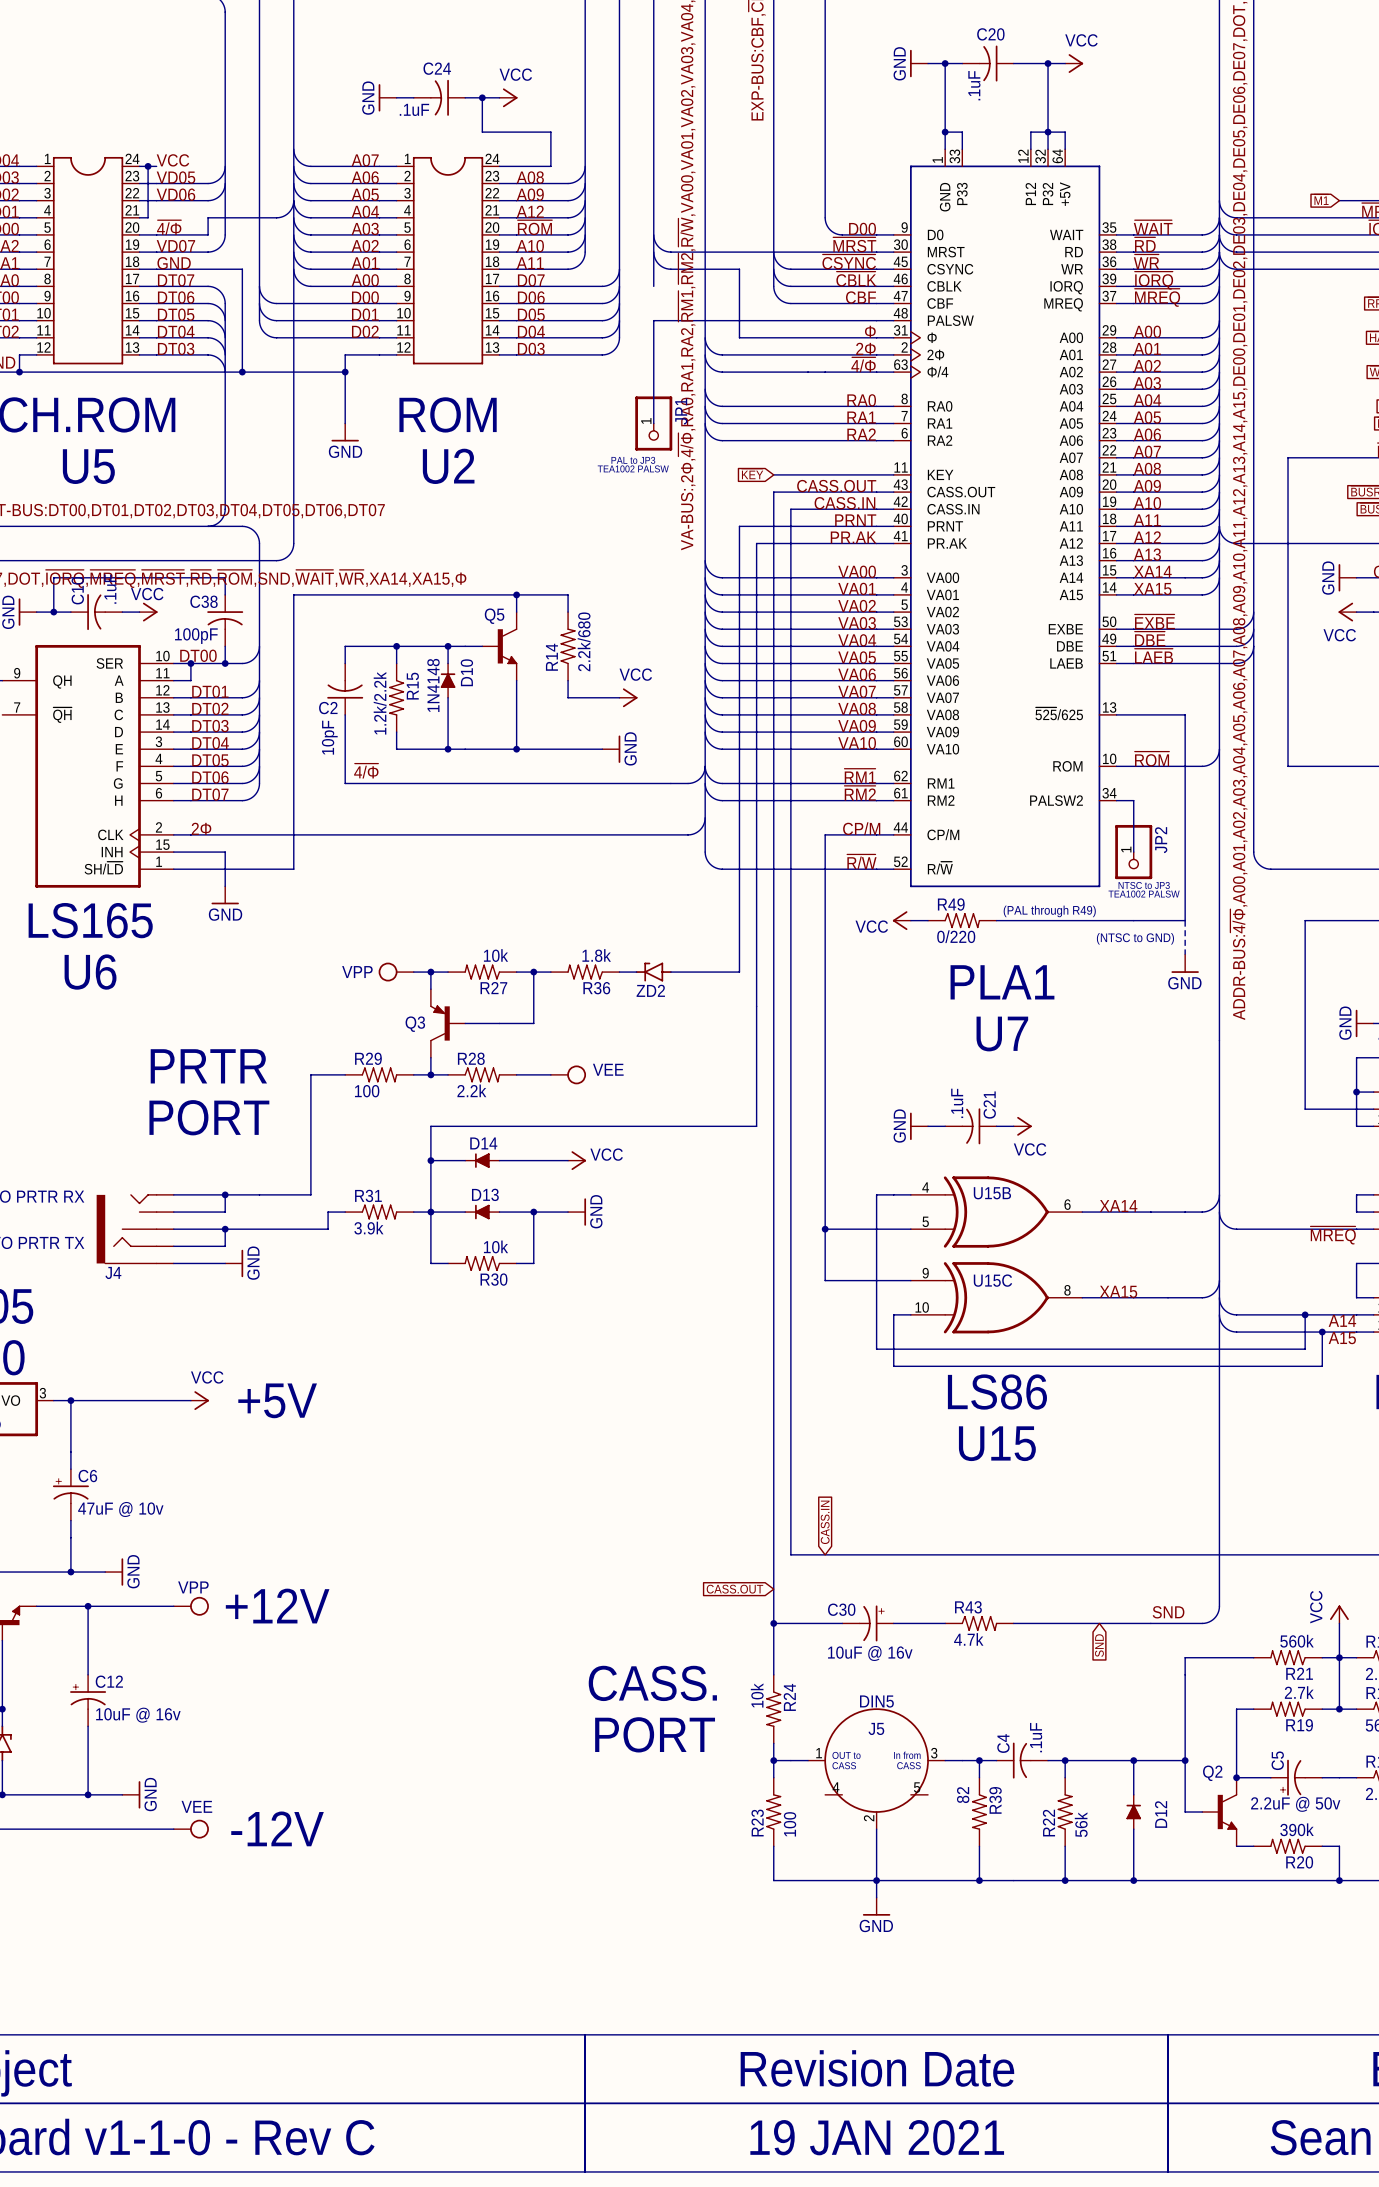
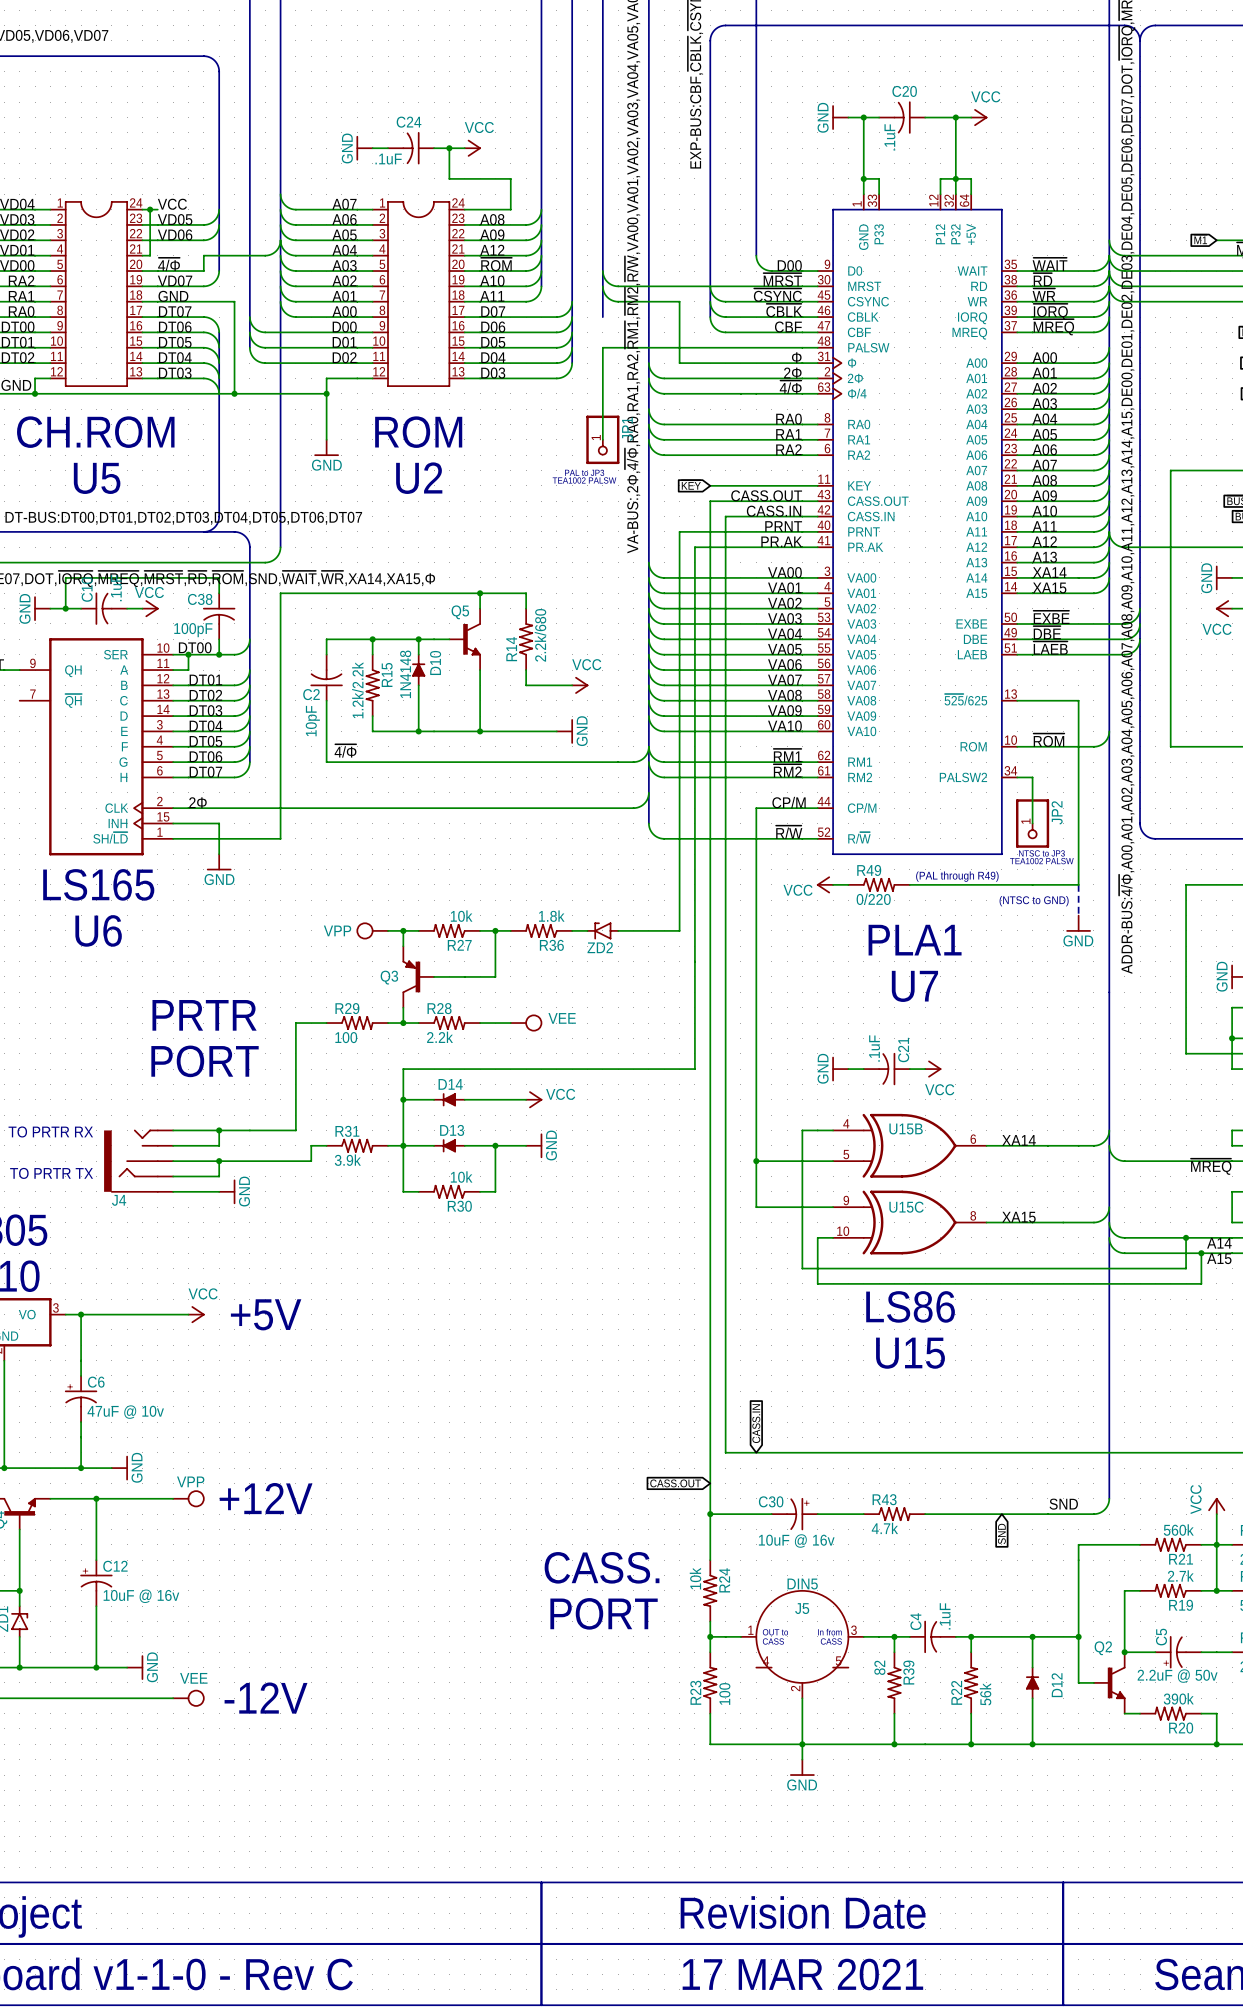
text: 19 JAN 2021 (877, 2137) -> 17 MAR 2021 (802, 1974)

